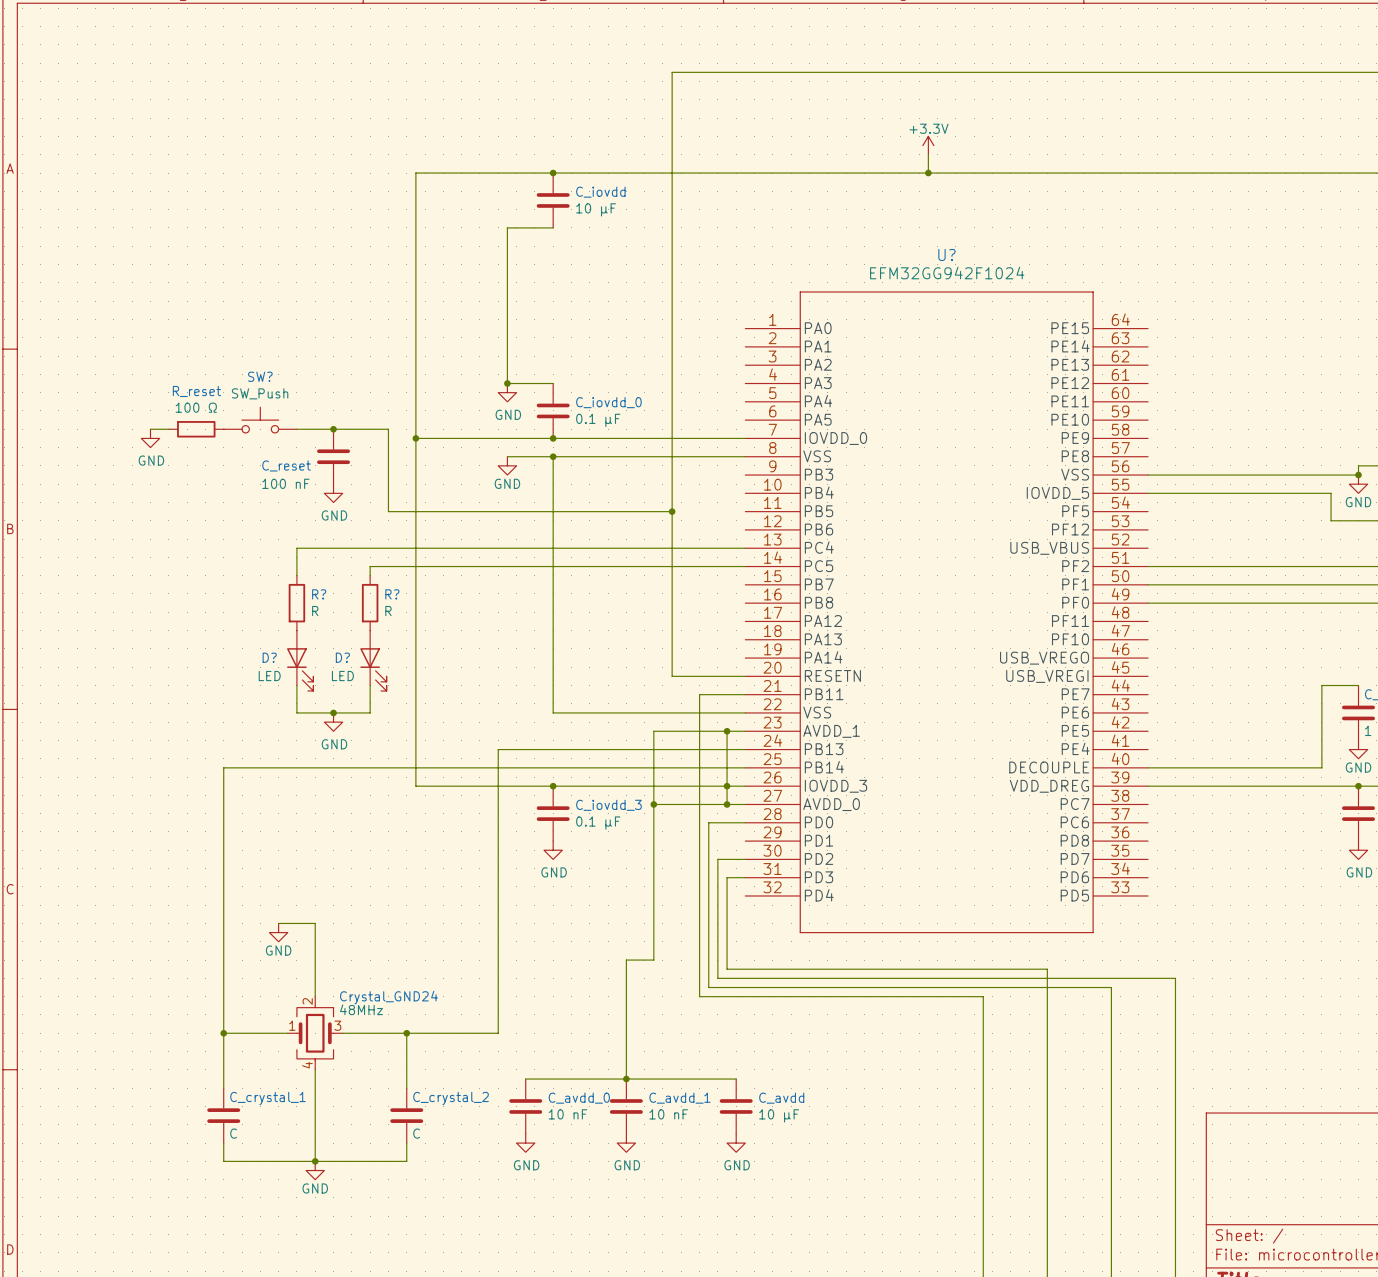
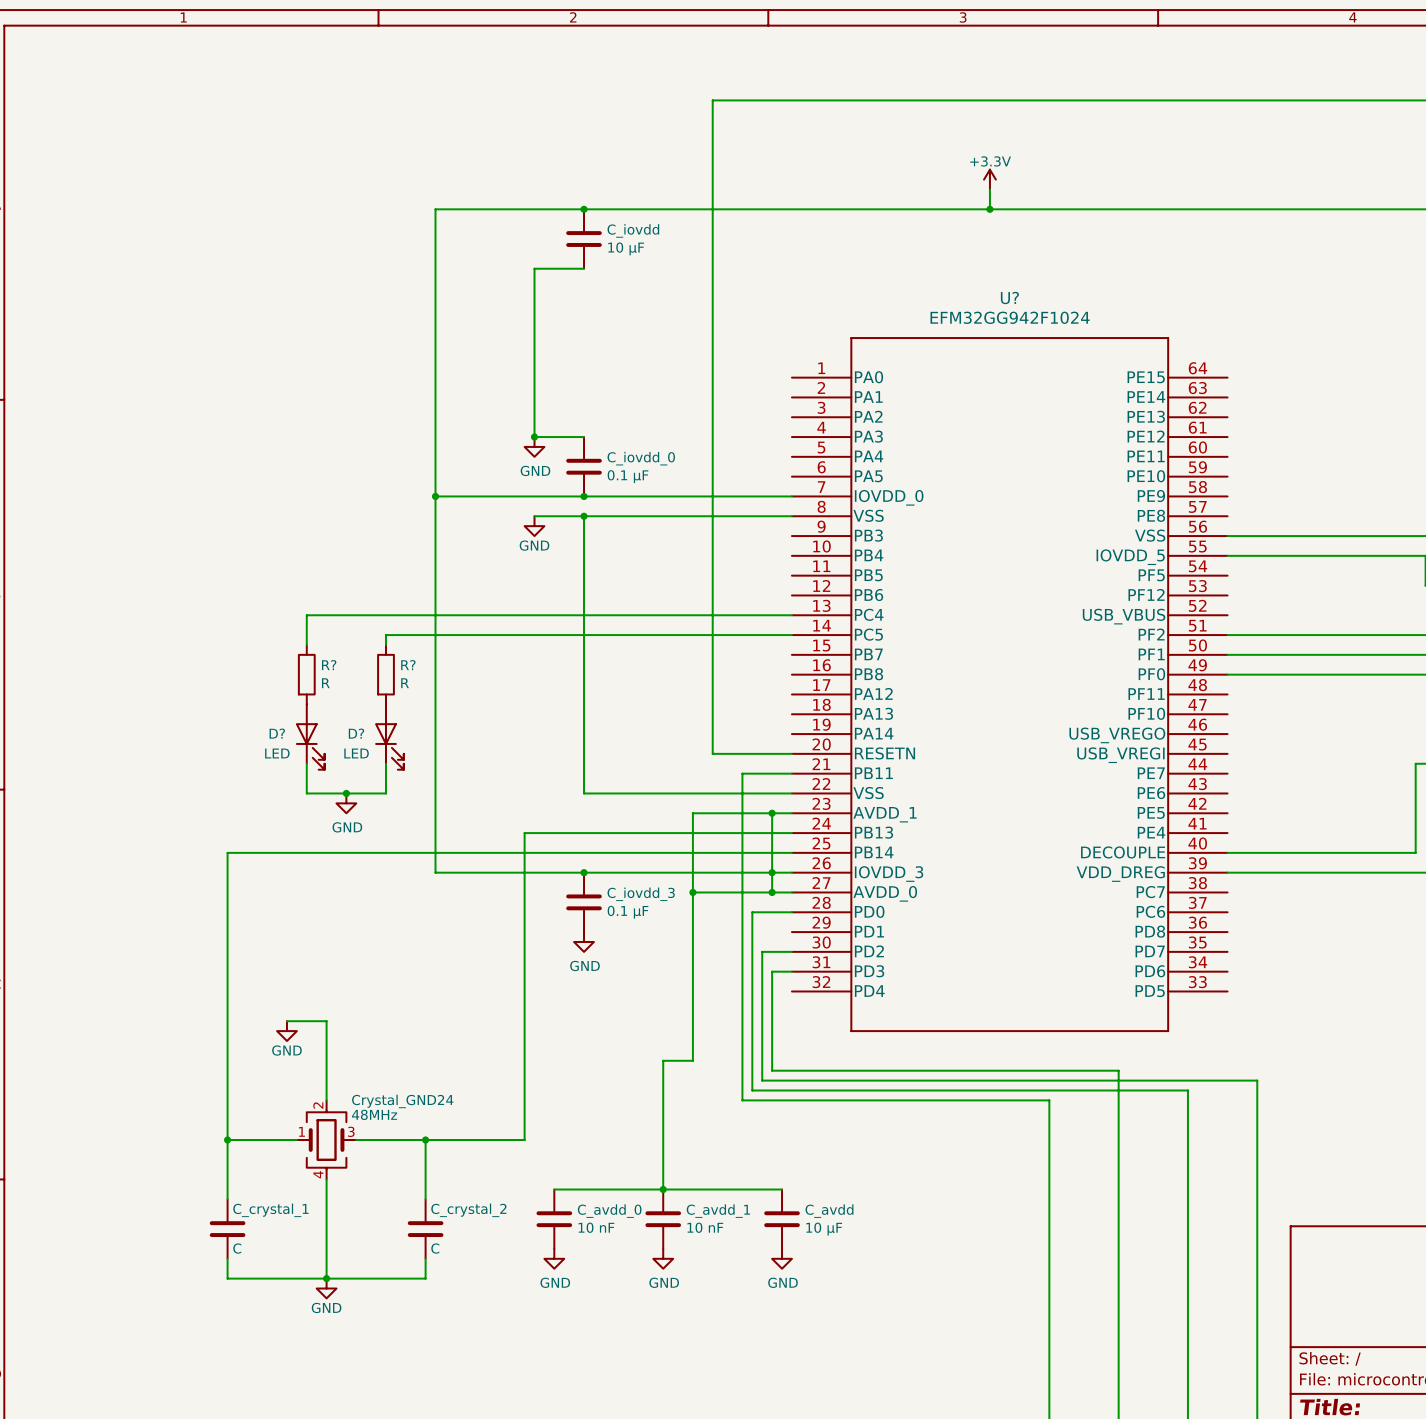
SW?: SW_Push (260, 420) -> none
wire: (150, 429) (168, 429) -> none
R_reset: 100 Ω (196, 429) -> none
wire: (296, 429) (388, 429) (388, 511) (672, 511) -> none
junction: (333, 429) -> none
power symbol: GND (150, 438) -> none
C_reset: 100 nF (333, 456) -> none
power symbol: GND (333, 493) -> none
junction: (672, 511) -> none

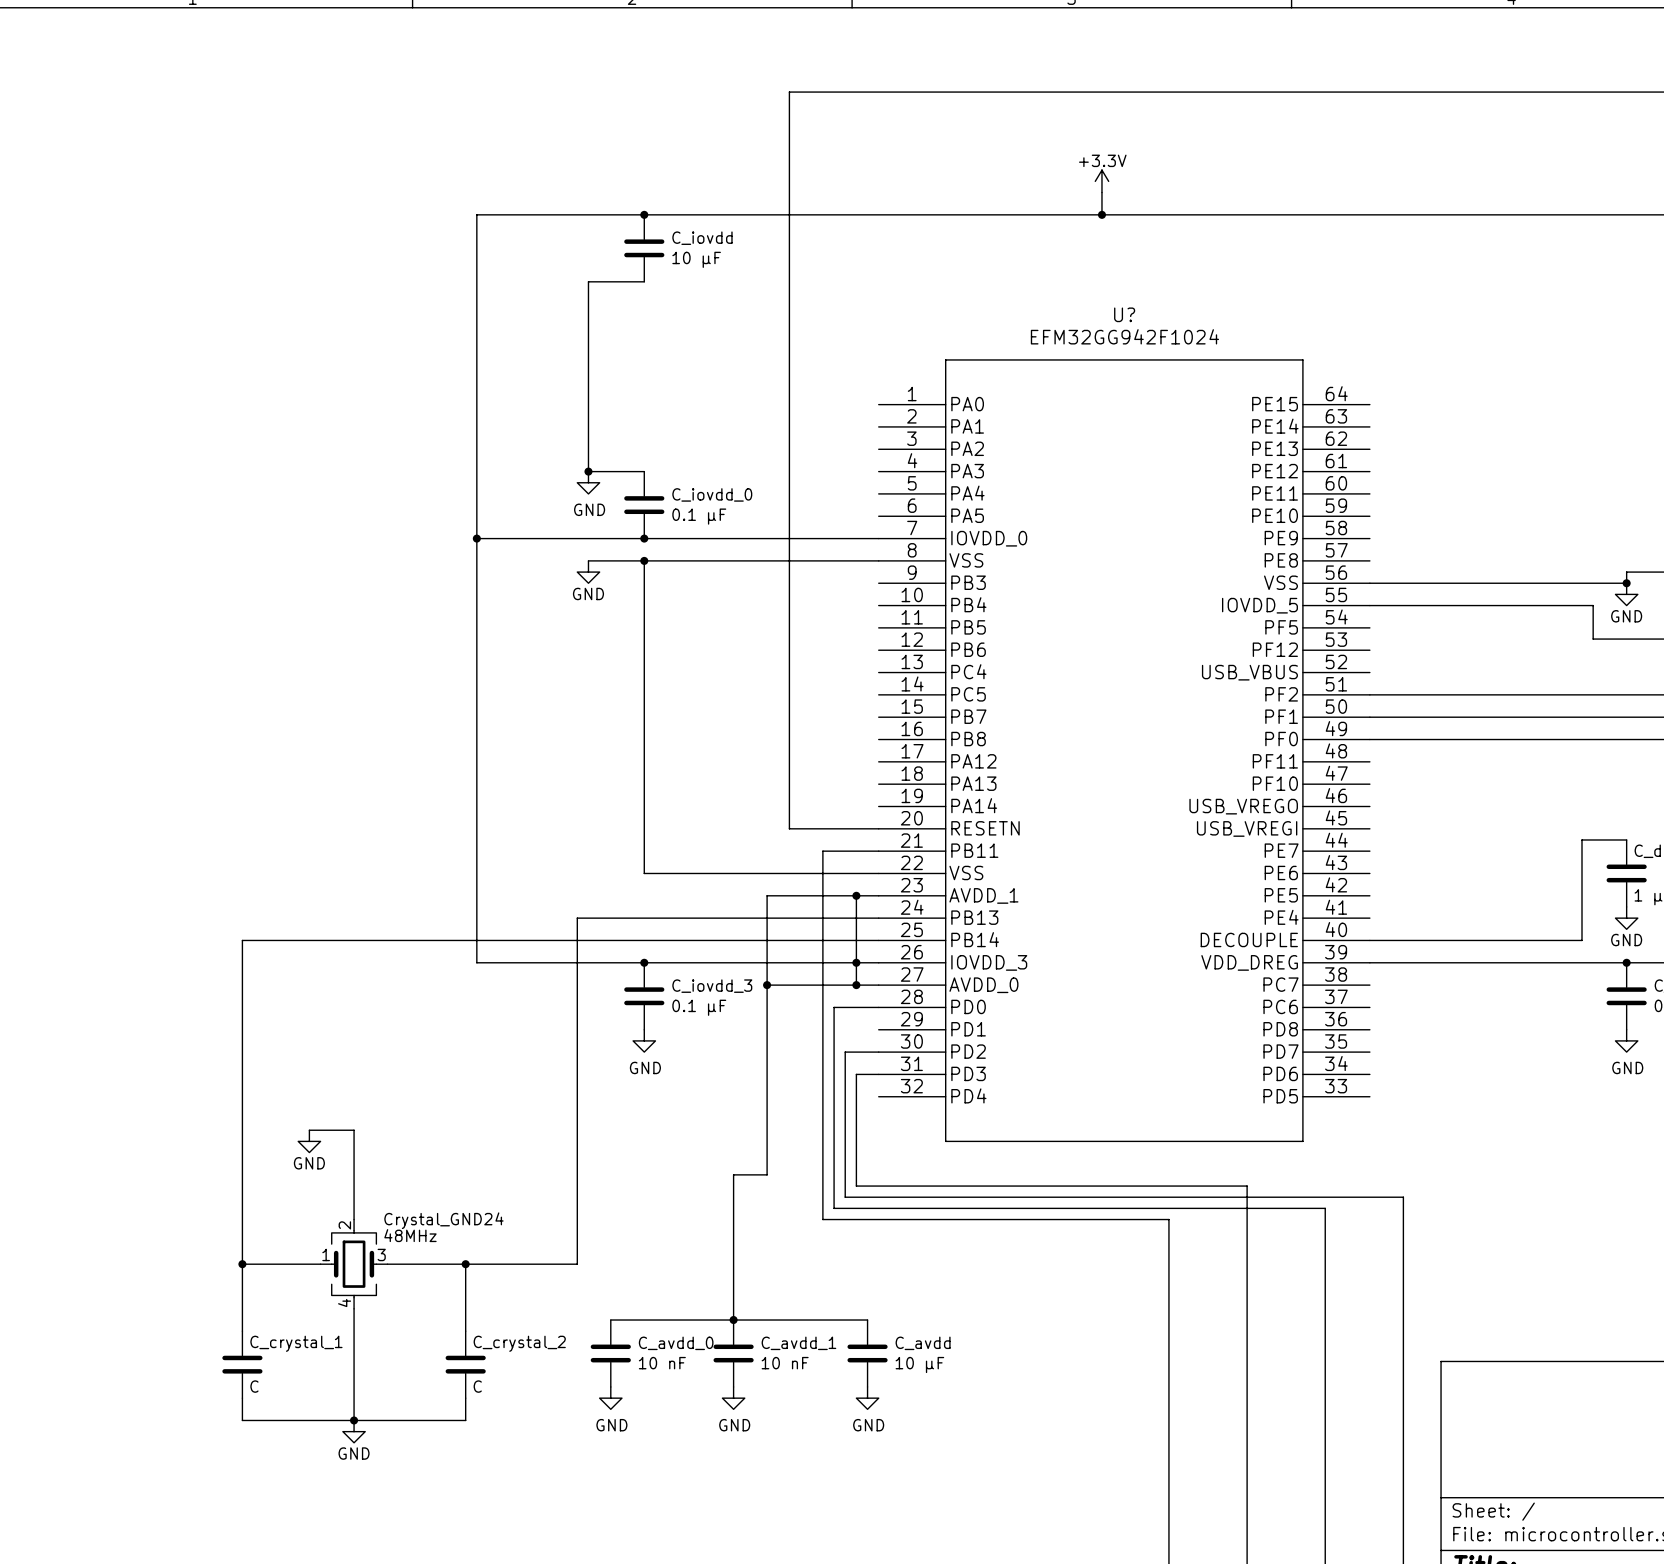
wire: (791, 615) (306, 615) (306, 644) -> none
wire: (791, 635) (385, 635) (385, 644) -> none
R?: R (306, 674) -> none
R?: R (385, 674) -> none
D?: LED (310, 737) -> none
D?: LED (389, 737) -> none
wire: (306, 763) (306, 793) (385, 793) (385, 763) -> none
junction: (346, 793) -> none
power symbol: GND (346, 803) -> none

